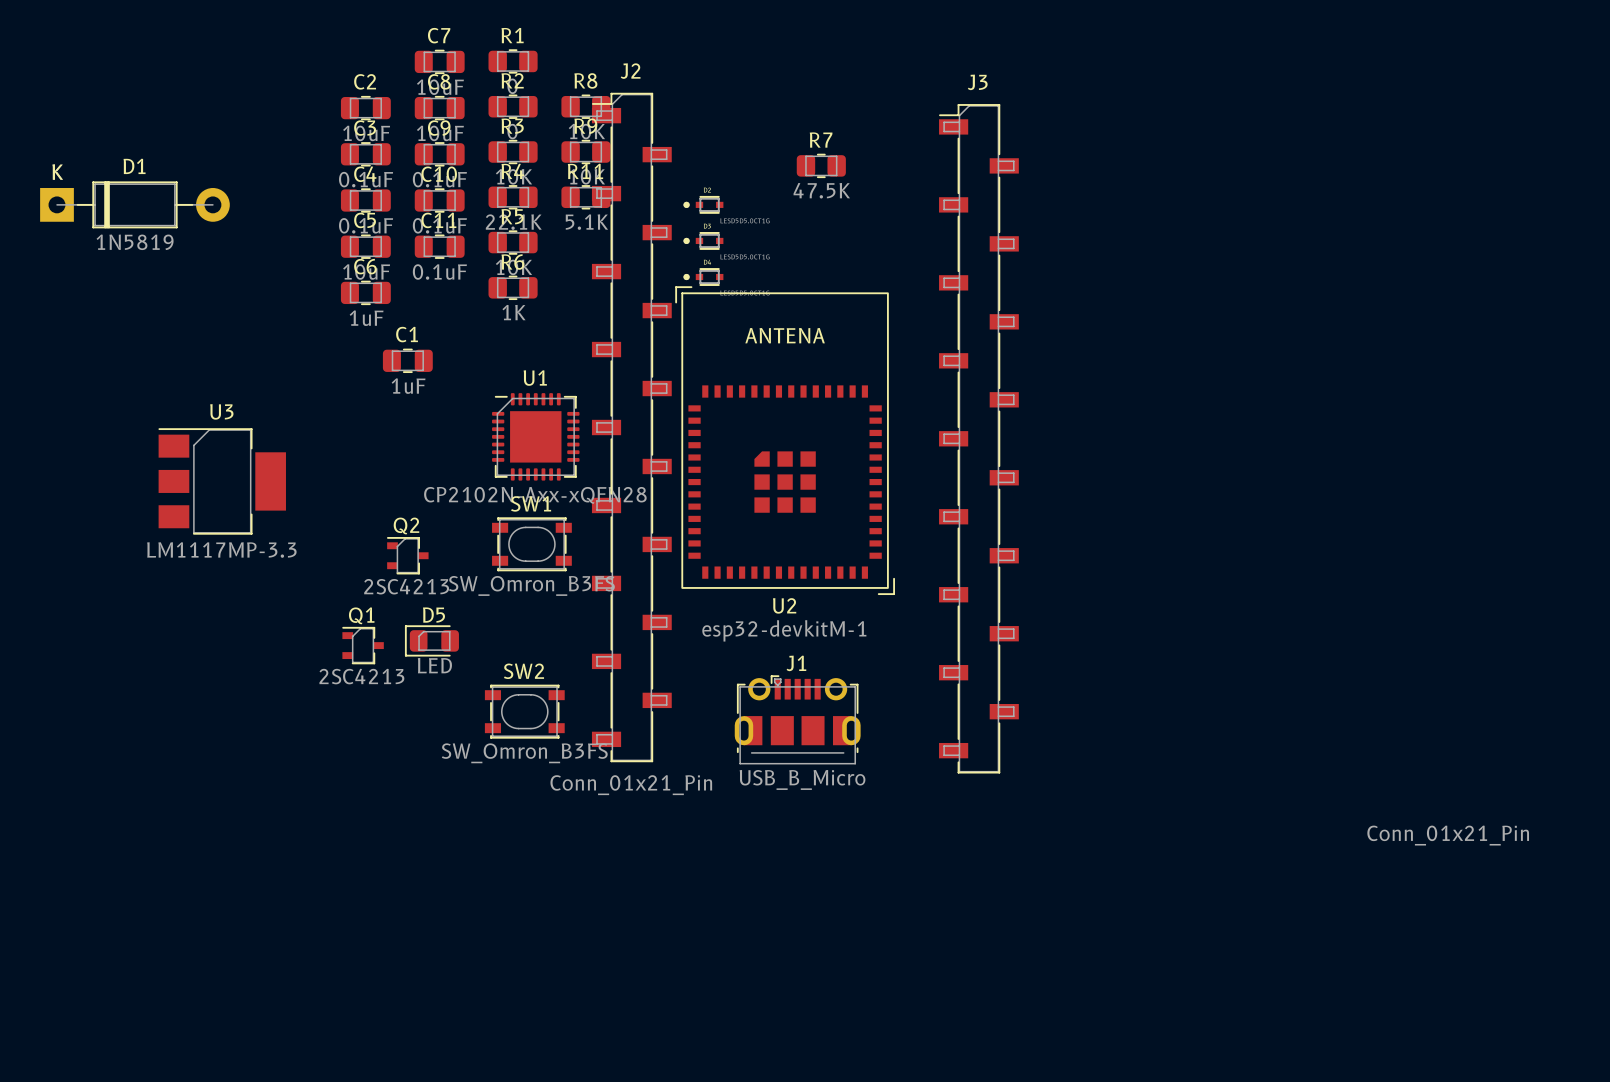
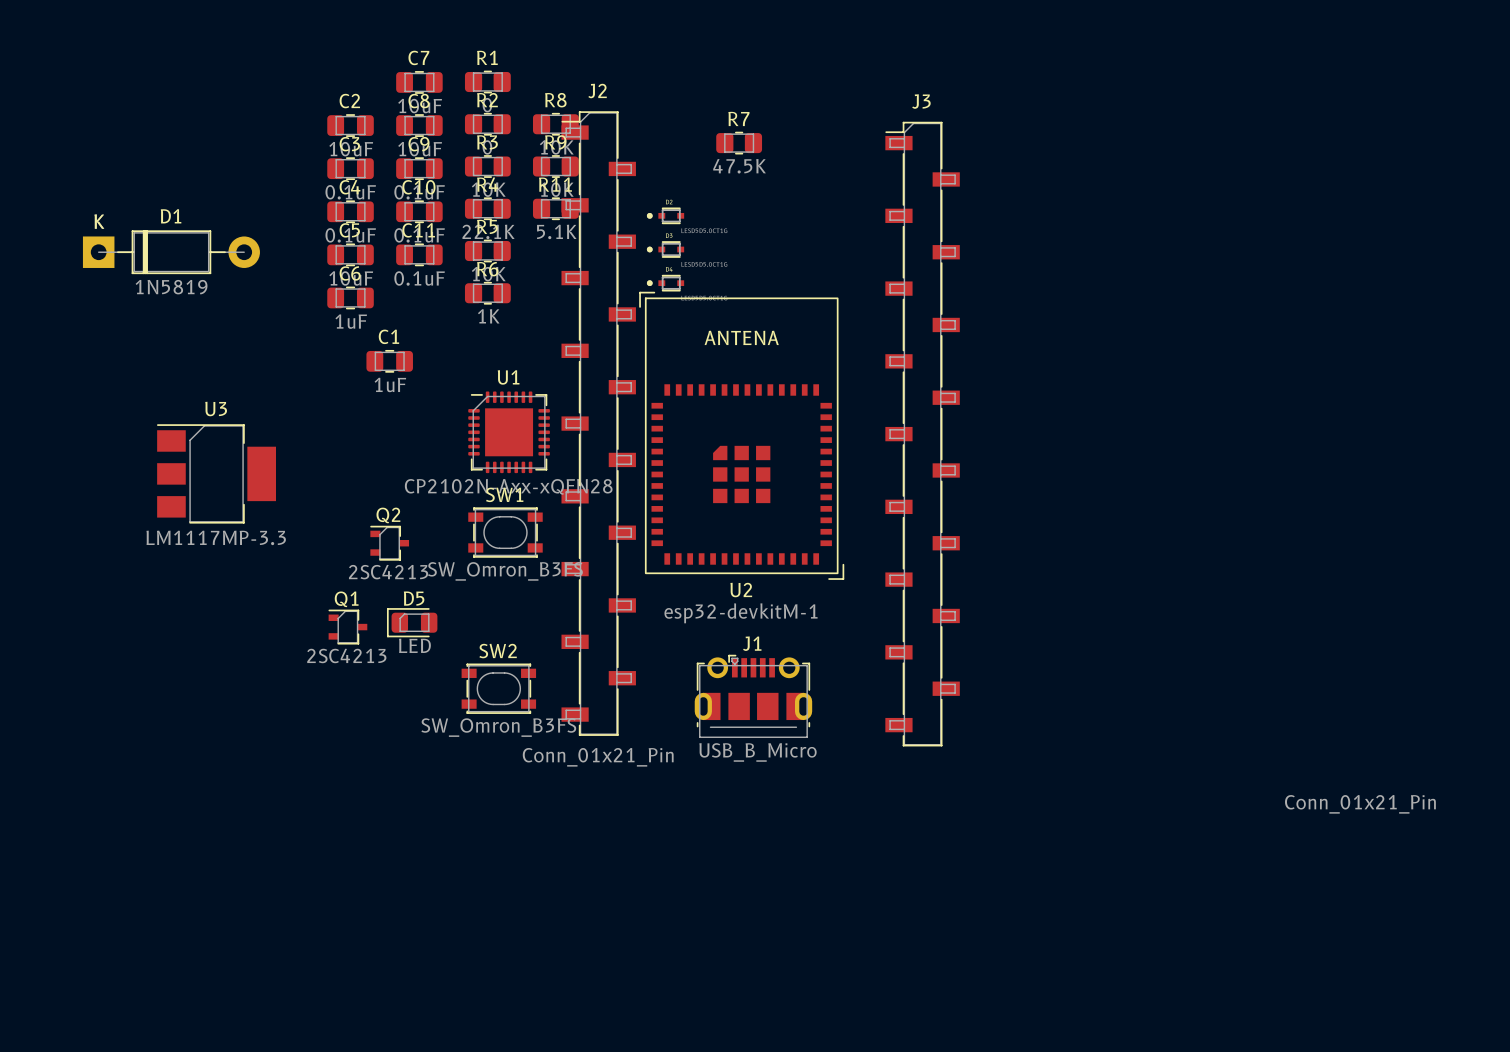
R7 position: (821, 165) -> (739, 143)
D1 position: (134, 204) -> (171, 252)

